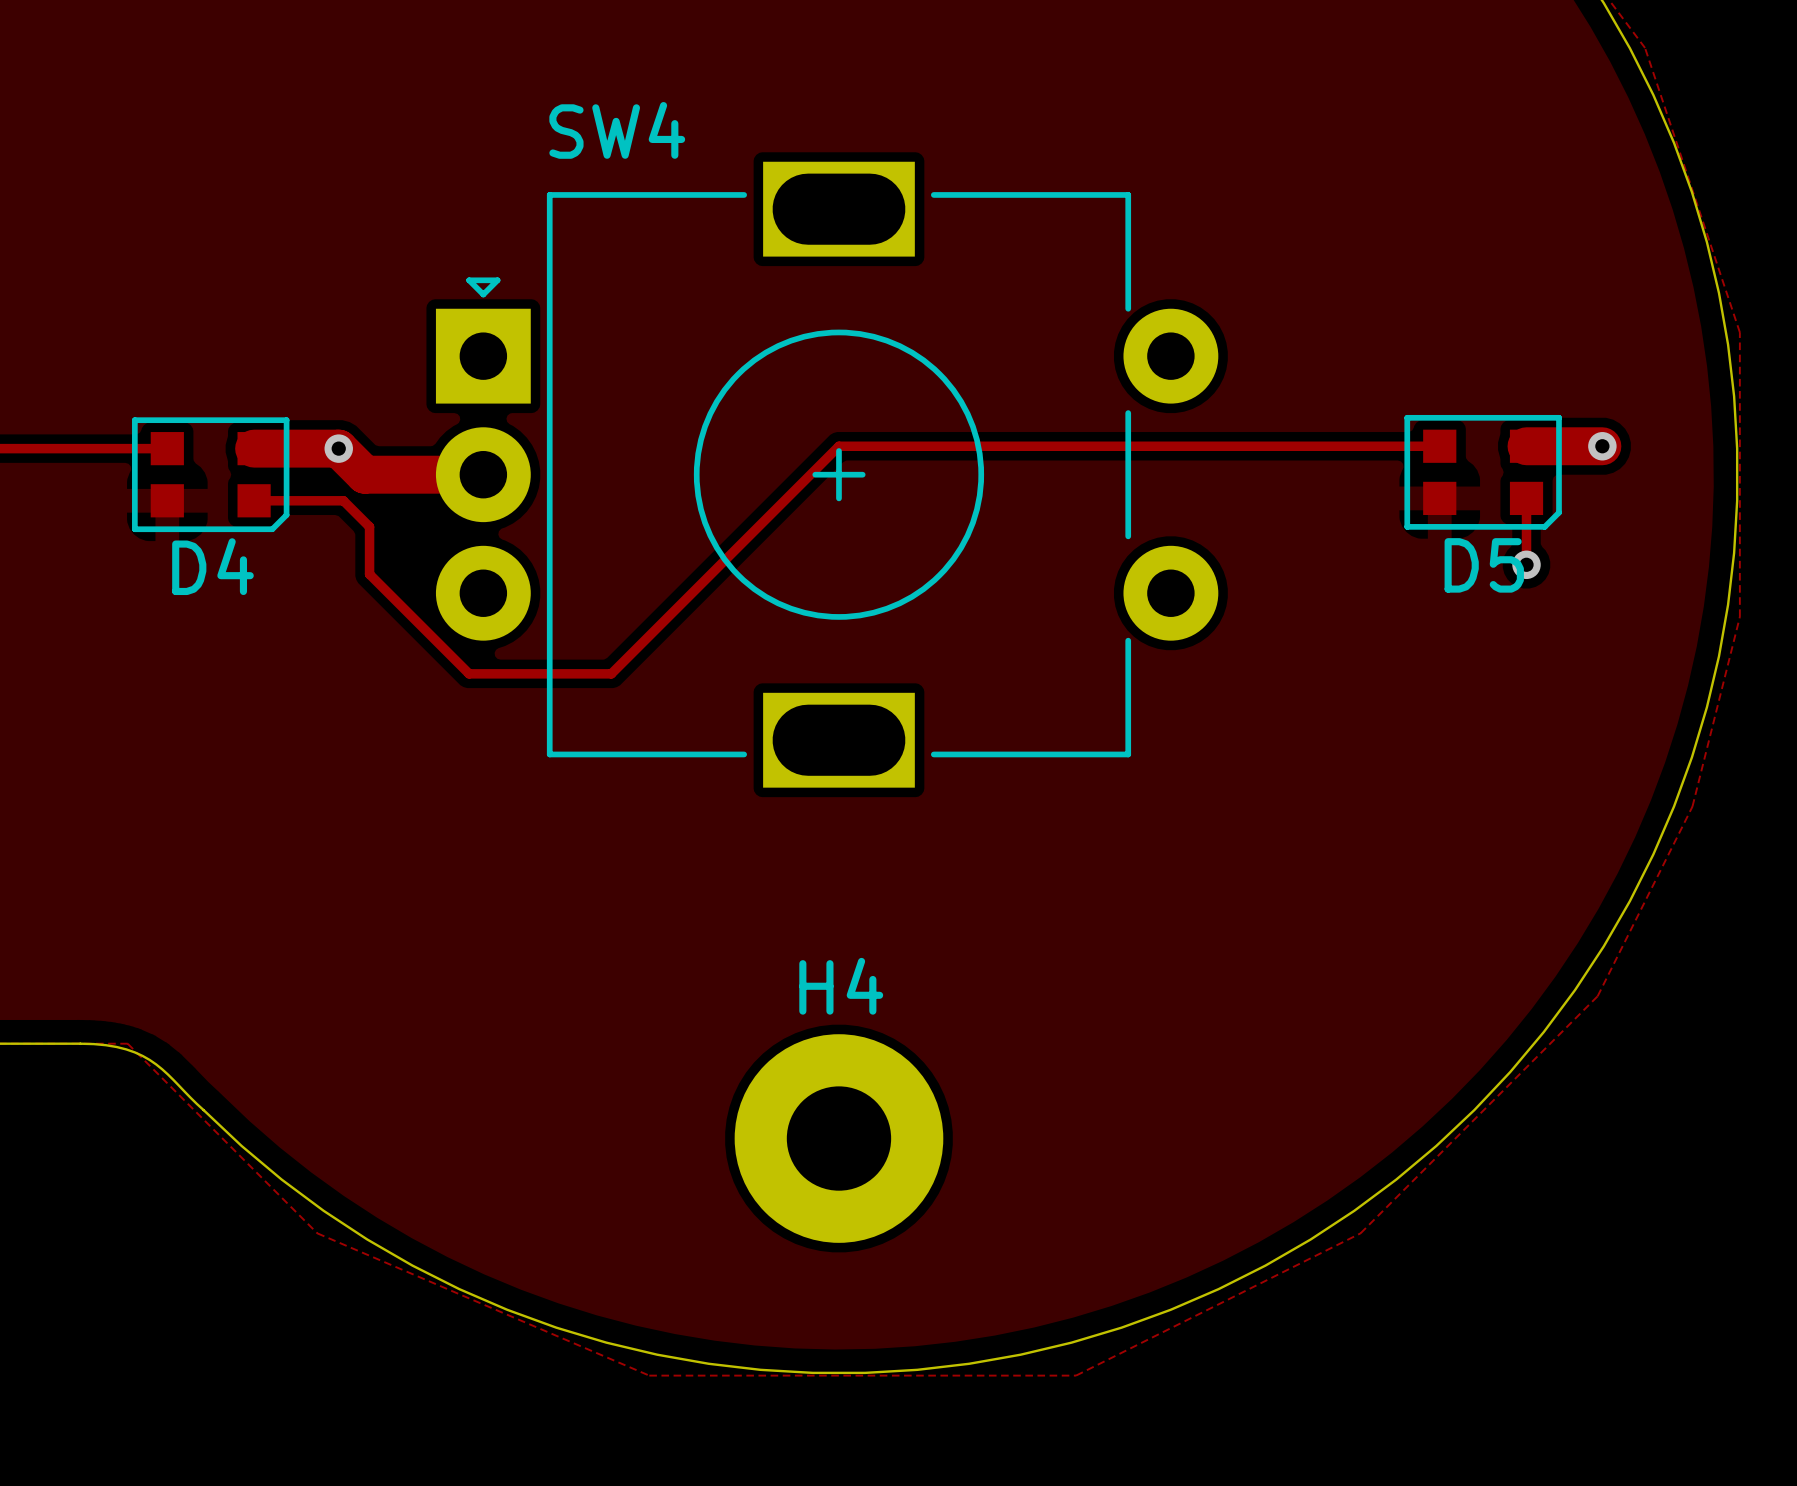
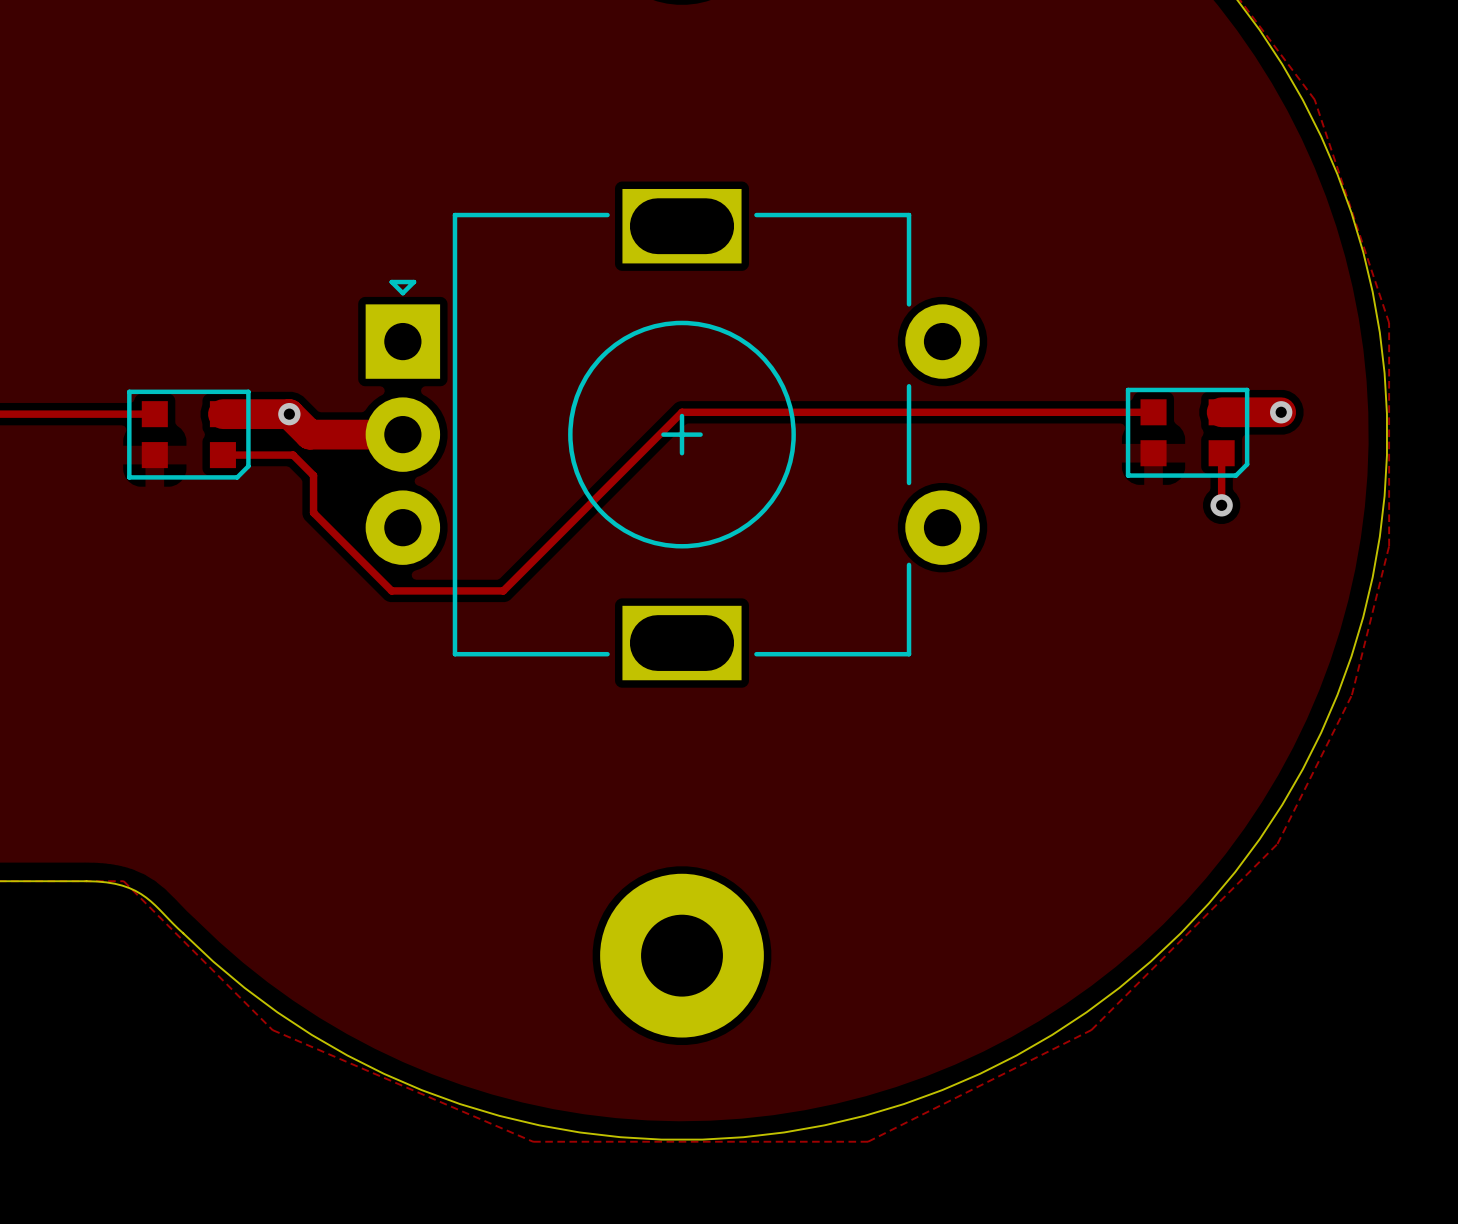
SW4 name: SW4 (617, 130) -> none
D5 name: D5 (1484, 565) -> none
D4 name: D4 (212, 566) -> none
H4 name: H4 (841, 986) -> none

